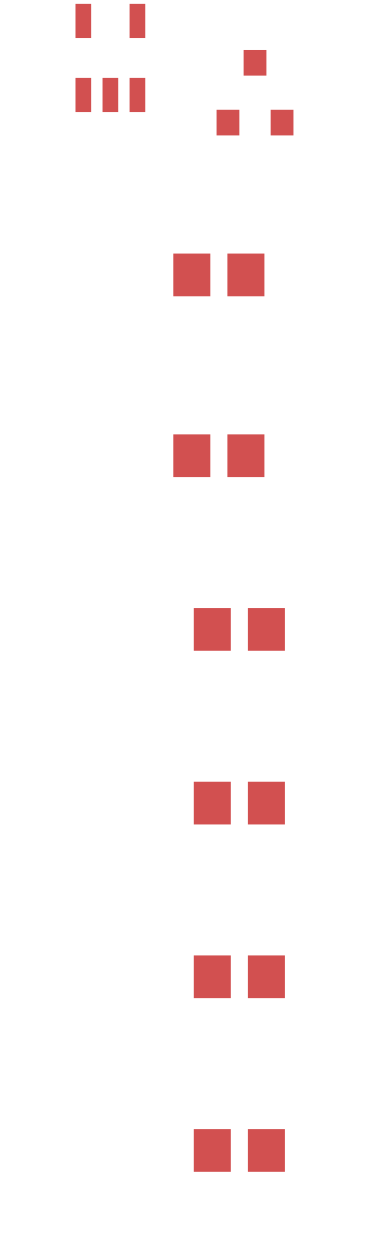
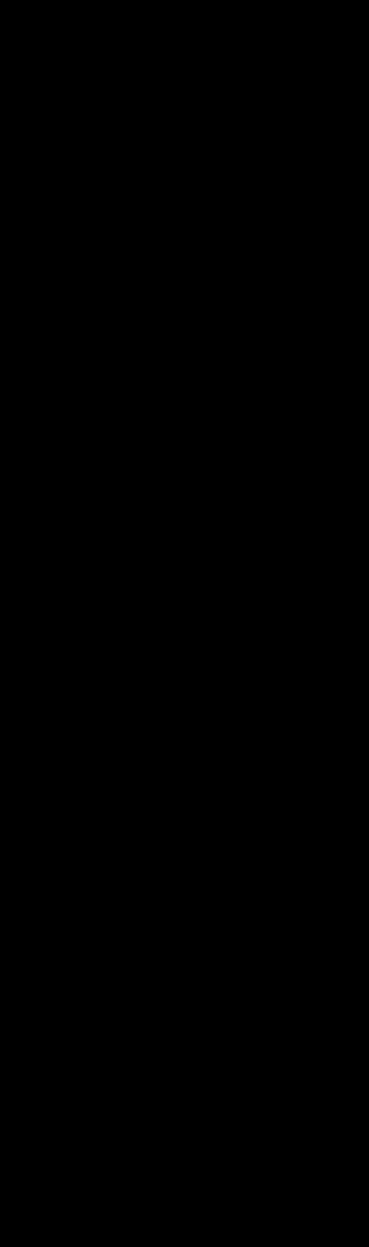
part: (110, 57) -> none
part: (255, 92) -> none
part: (218, 274) -> none
part: (218, 455) -> none
part: (239, 629) -> none
part: (239, 803) -> none
part: (239, 976) -> none
part: (239, 1150) -> none

